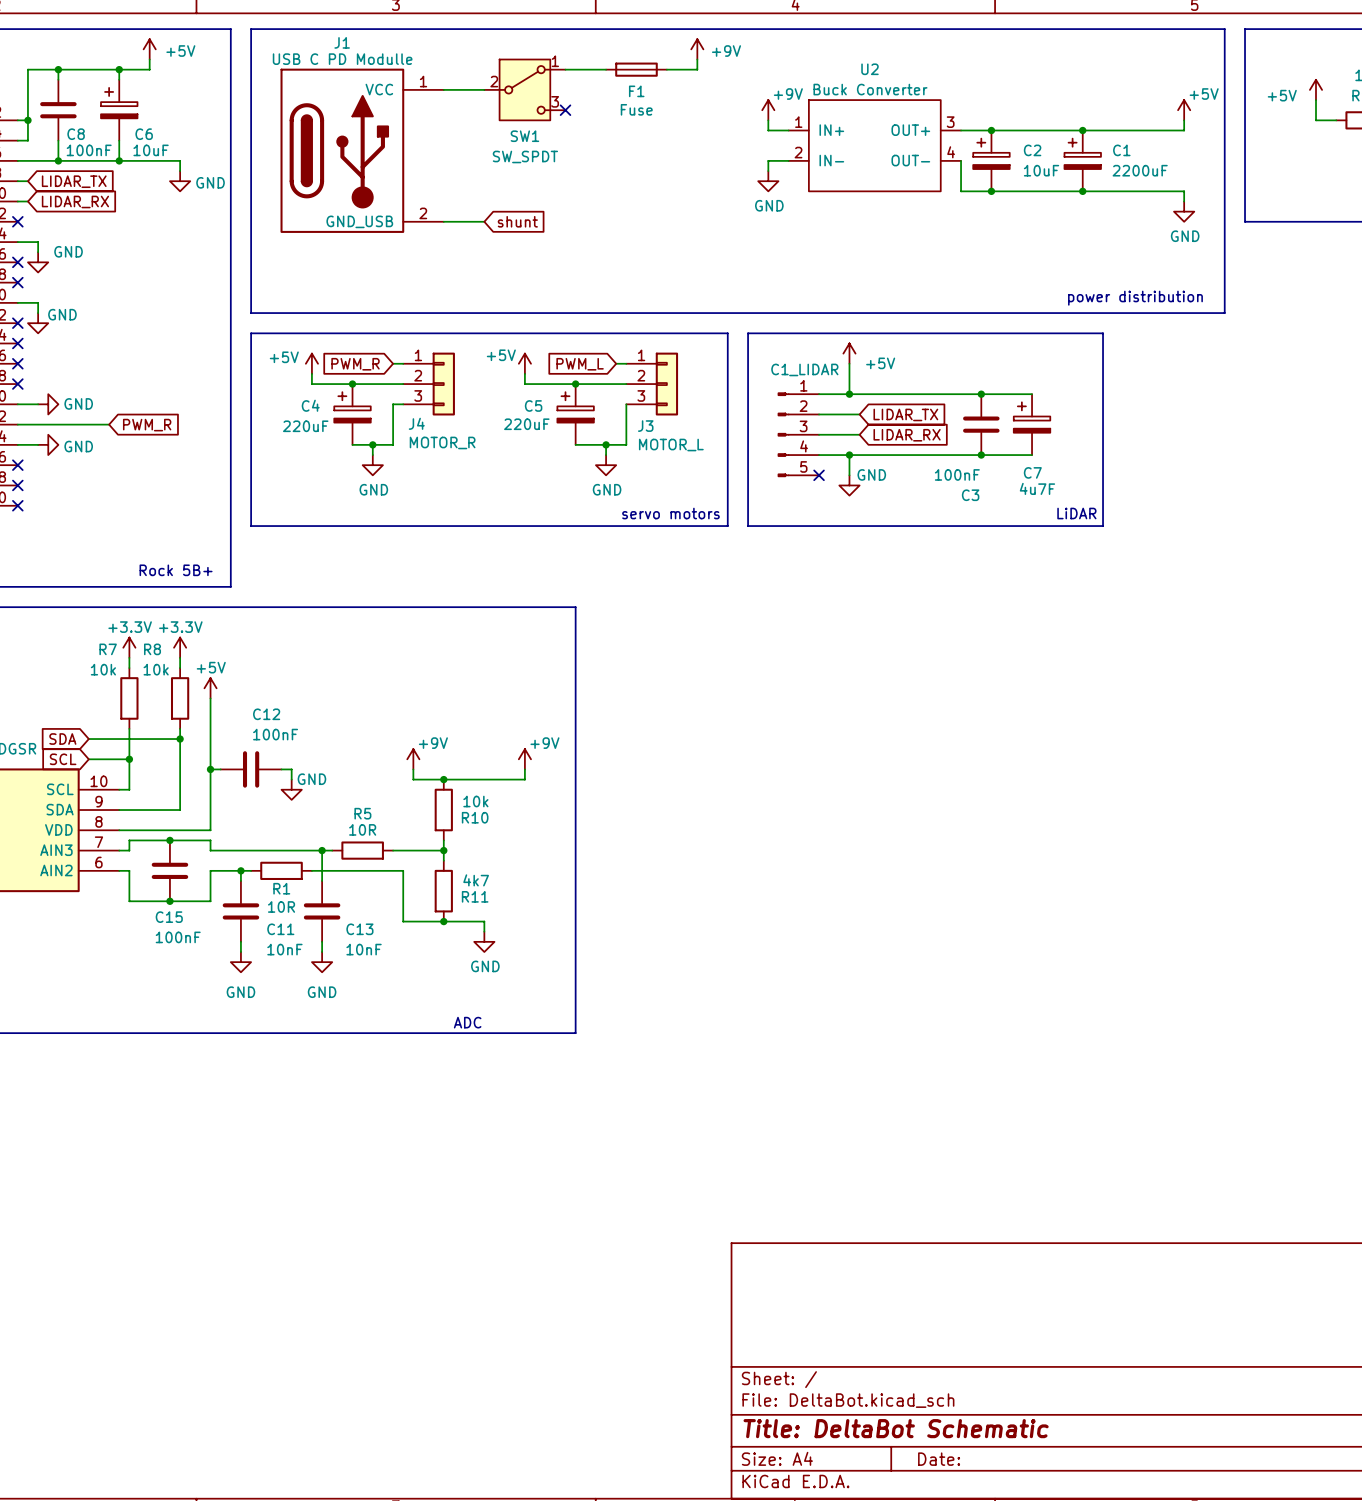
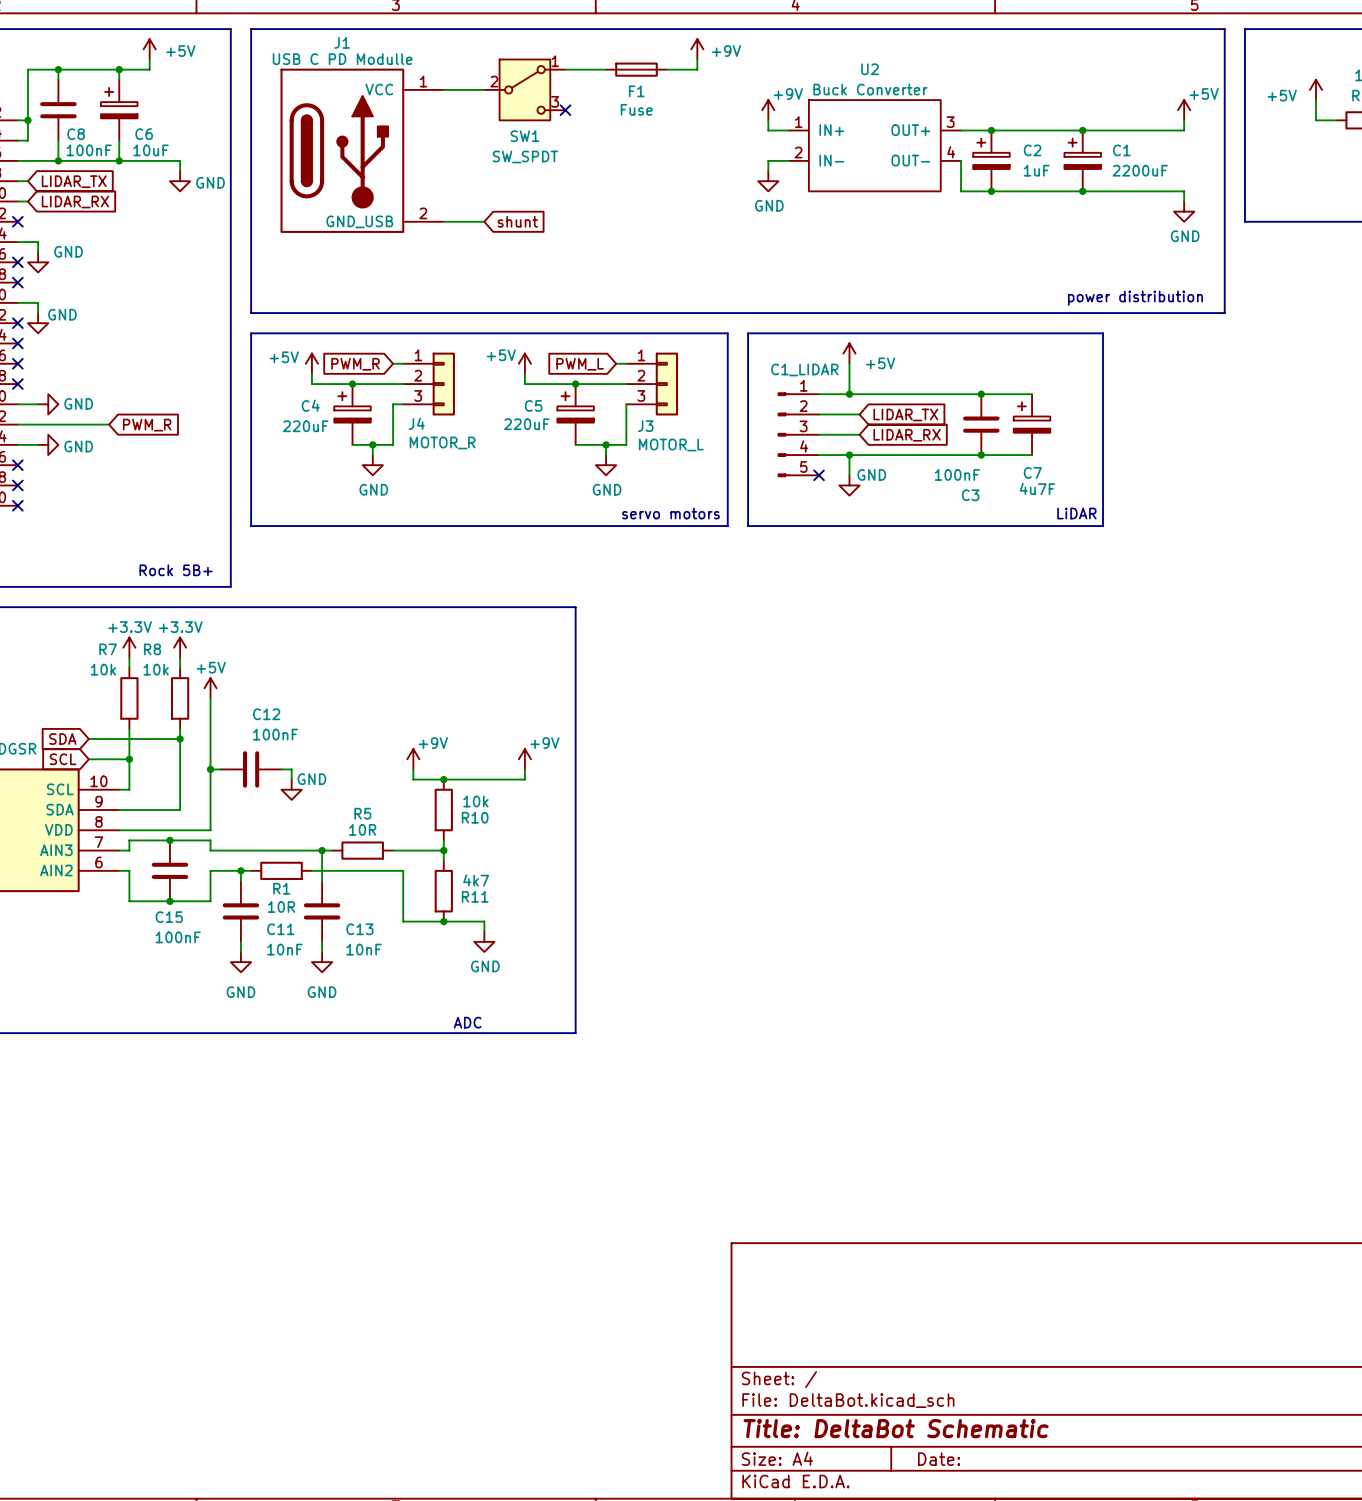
C2 value: 10uF (1041, 170) -> 1uF (1036, 170)

